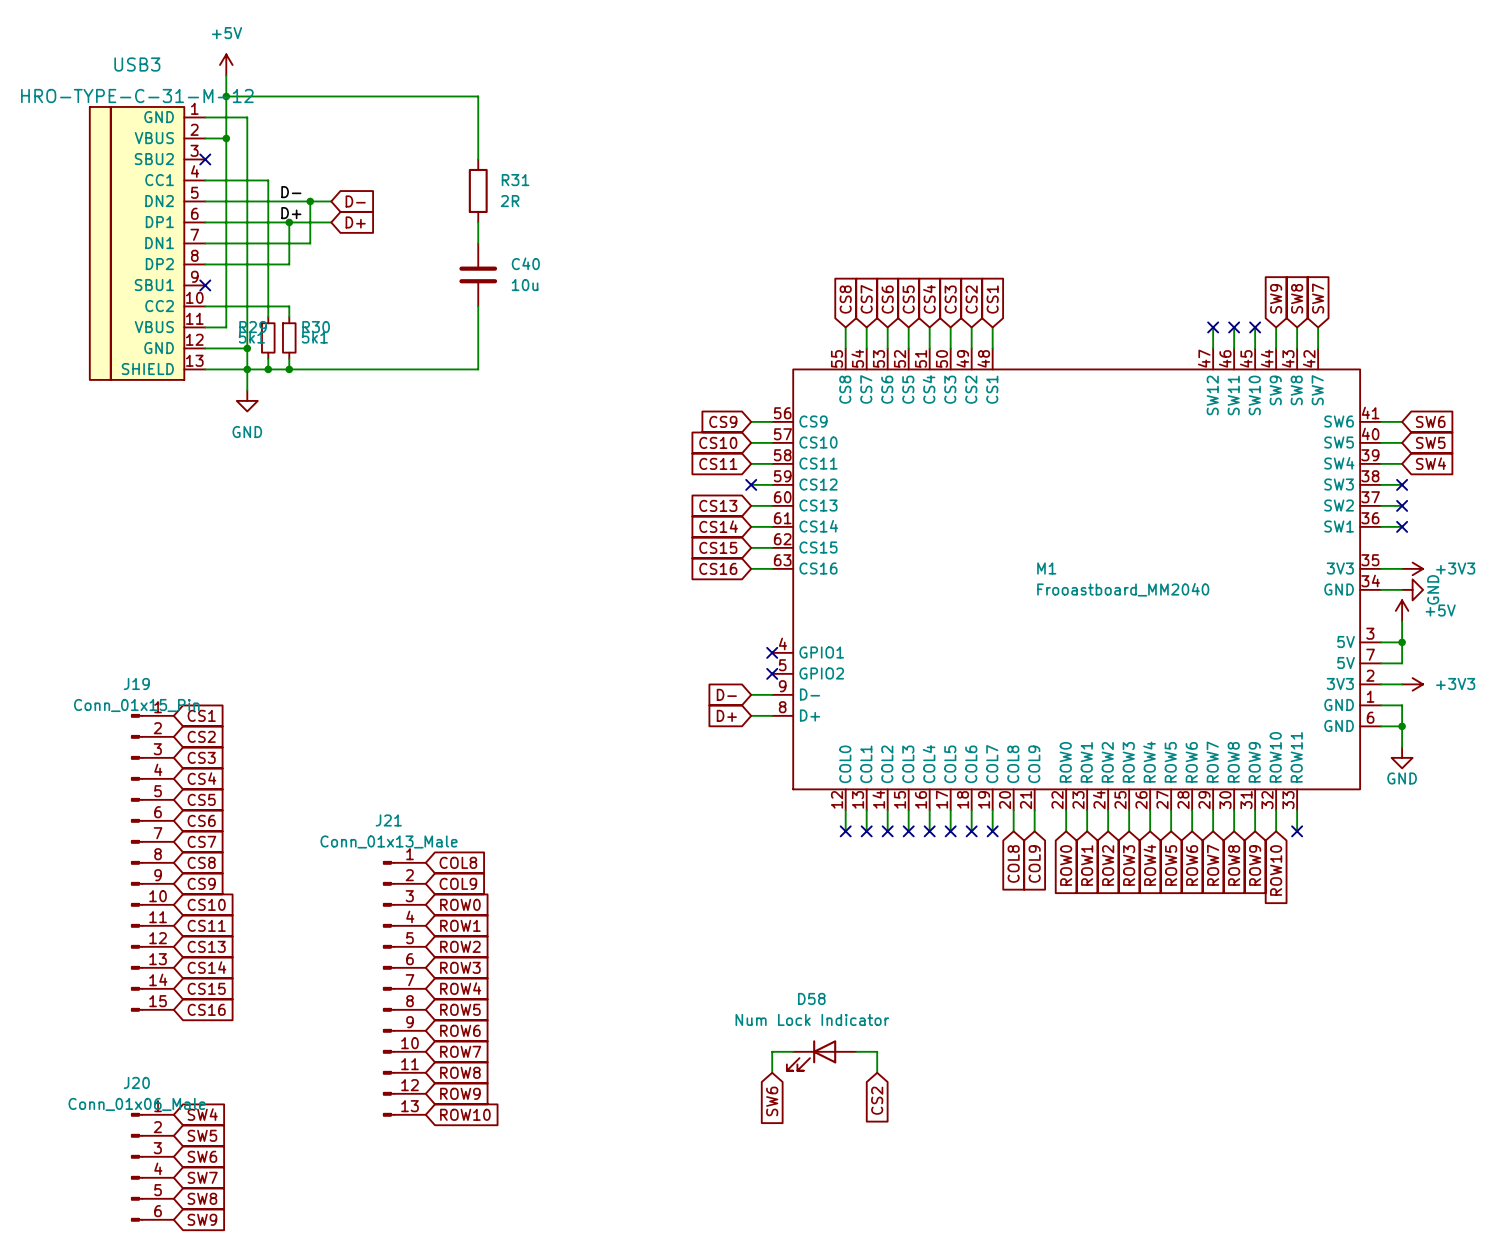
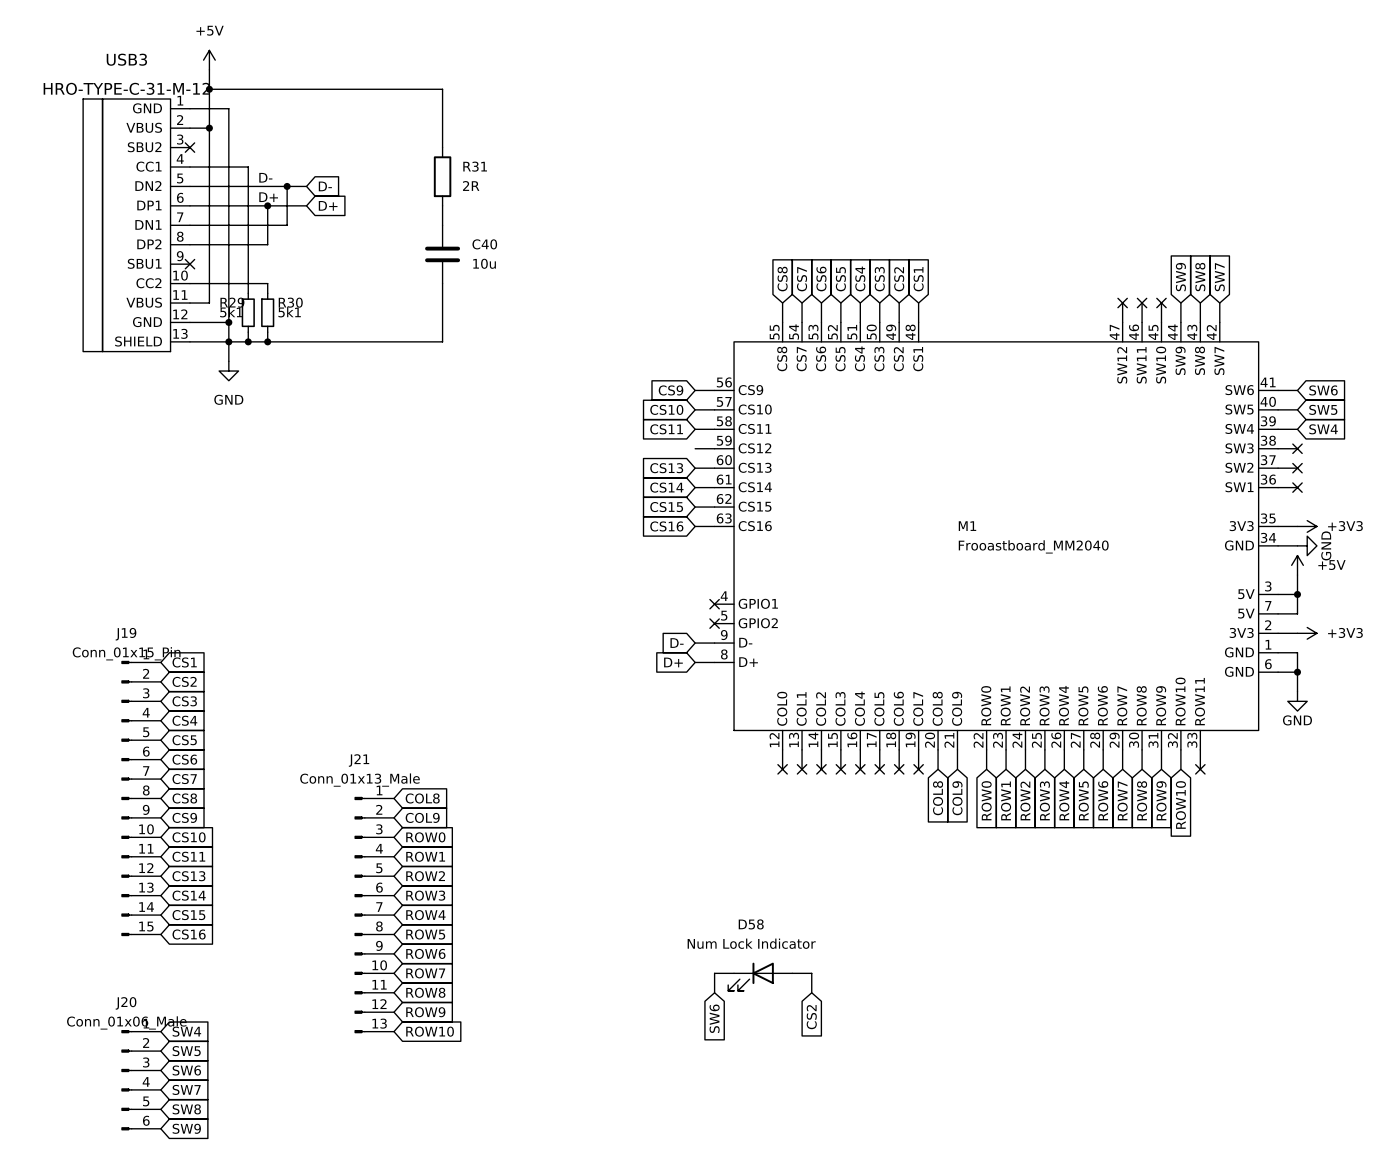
no-connect mark: (751, 484) -> none

